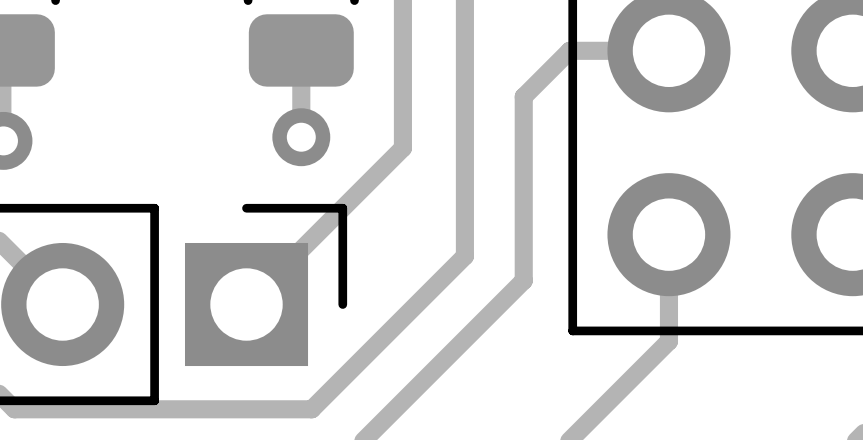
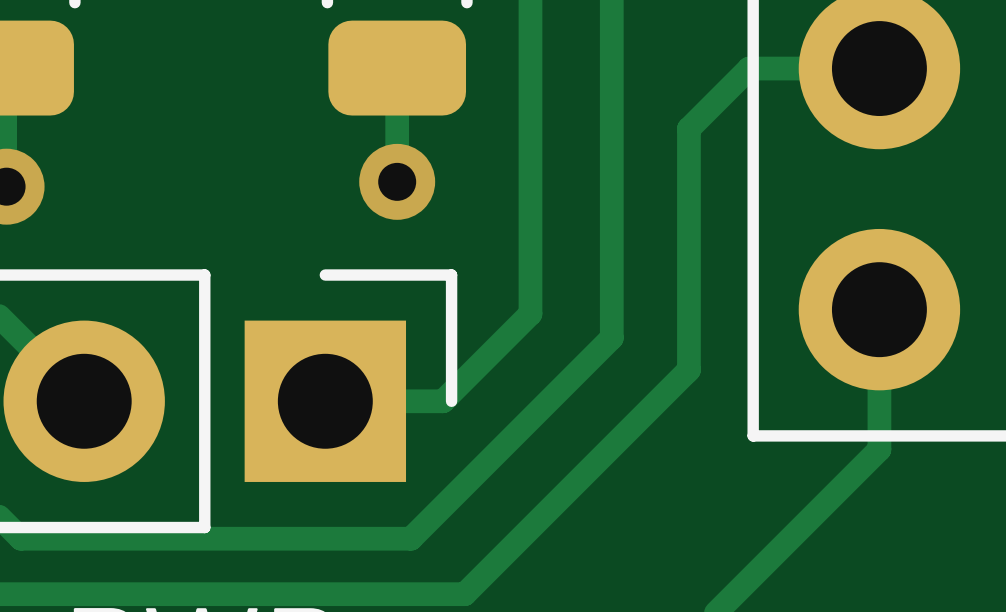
track: (402, 148) (246, 304) -> (530, 196) (530, 313) (443, 401) (325, 401)

